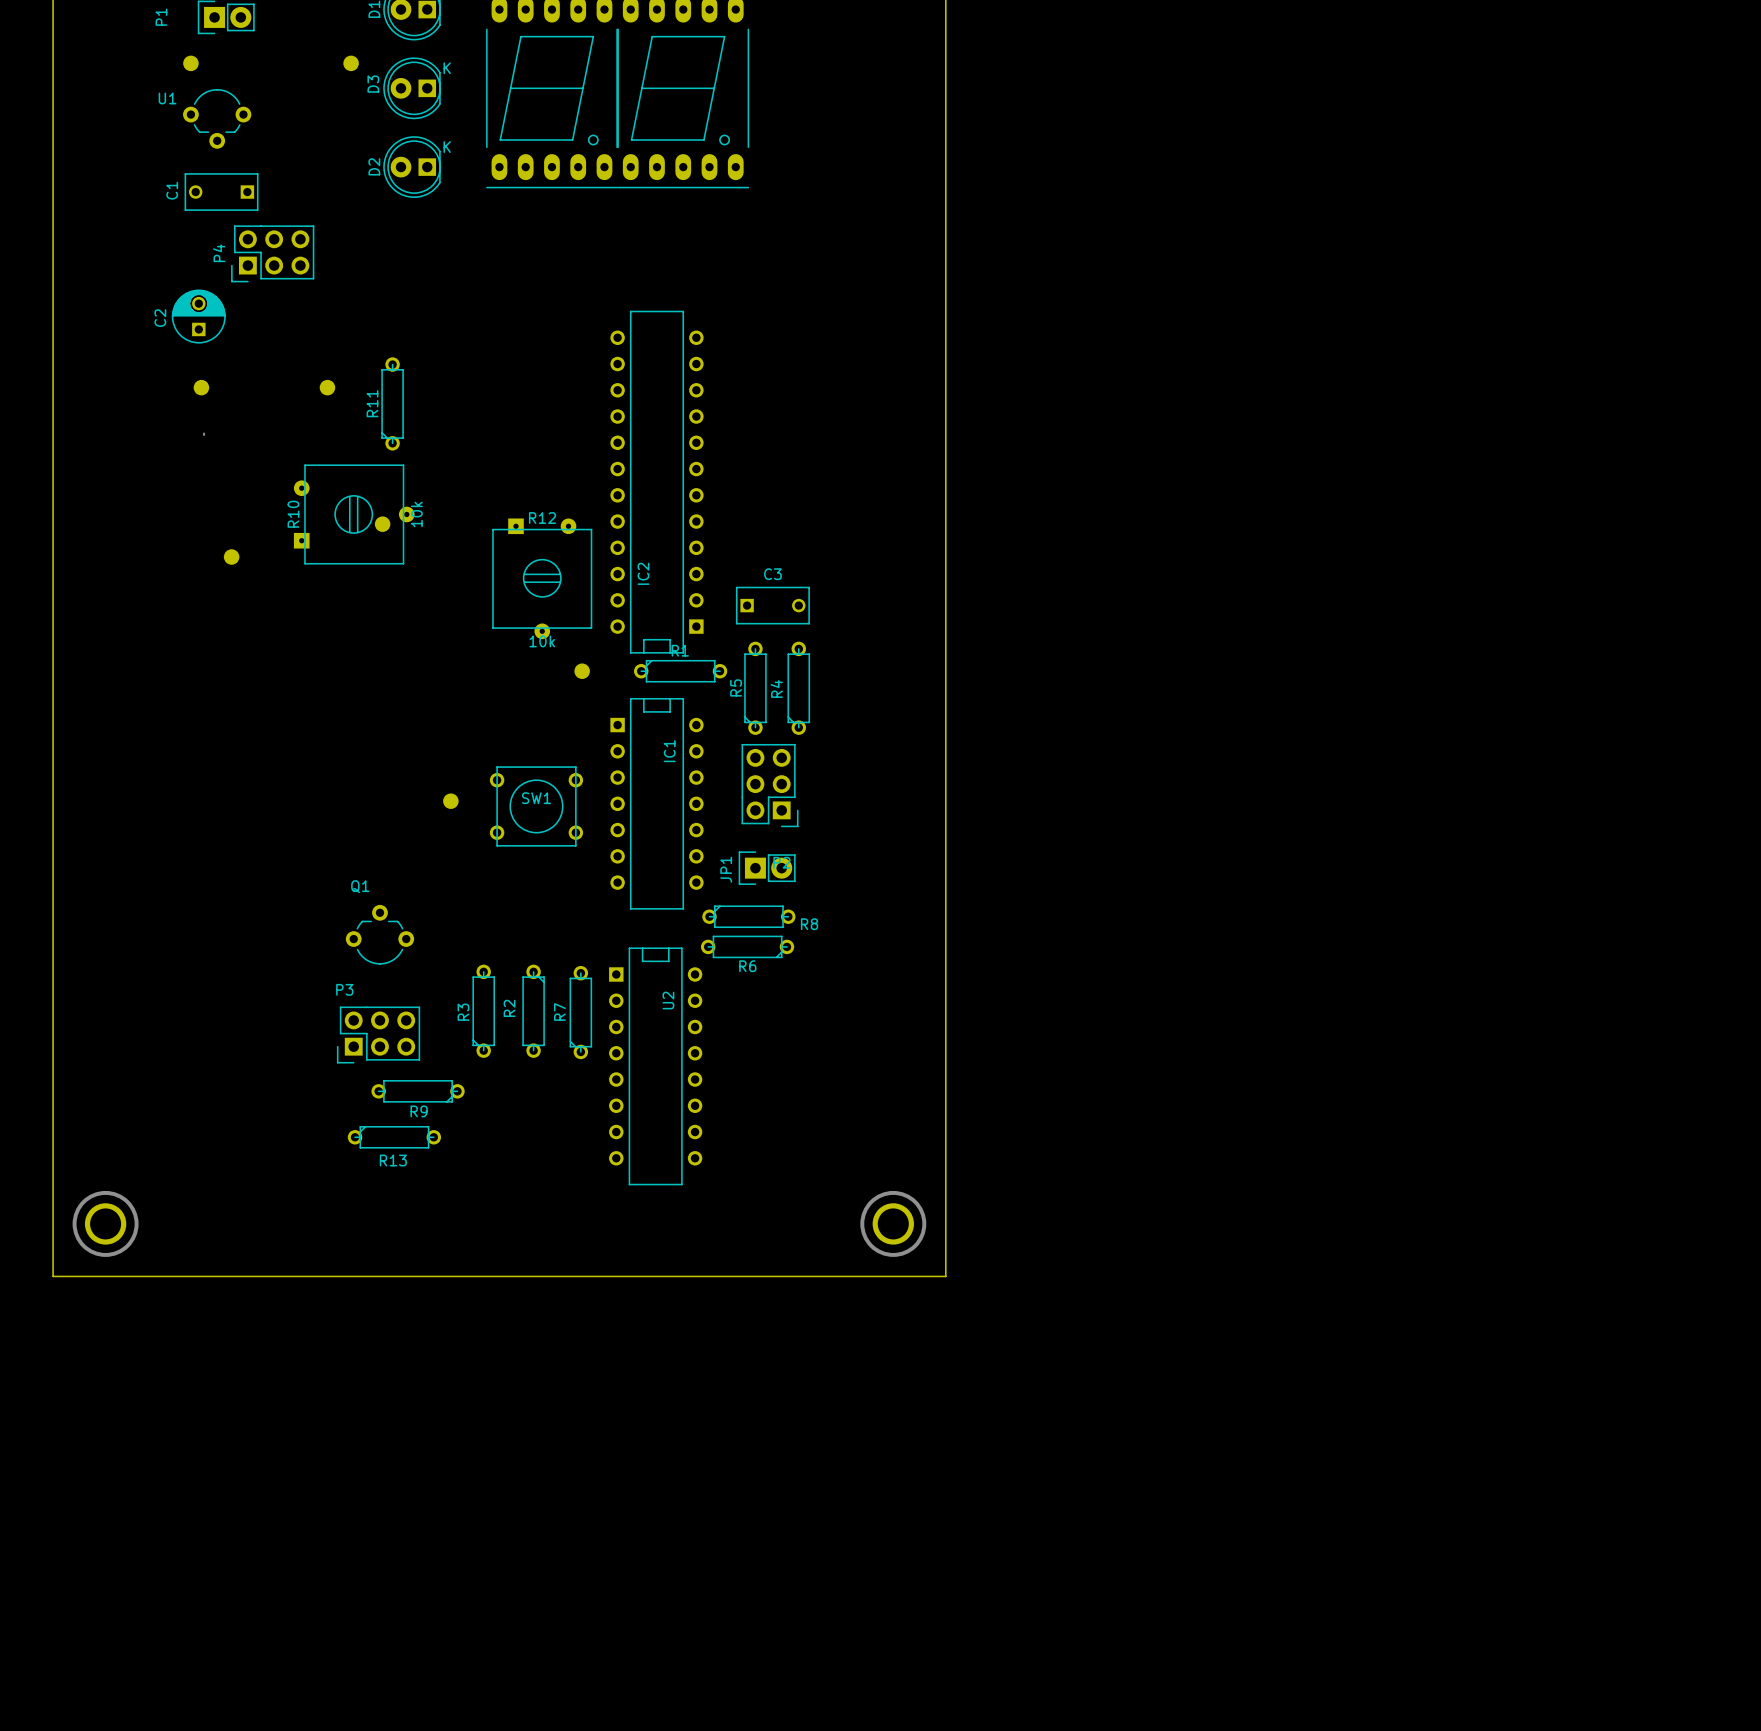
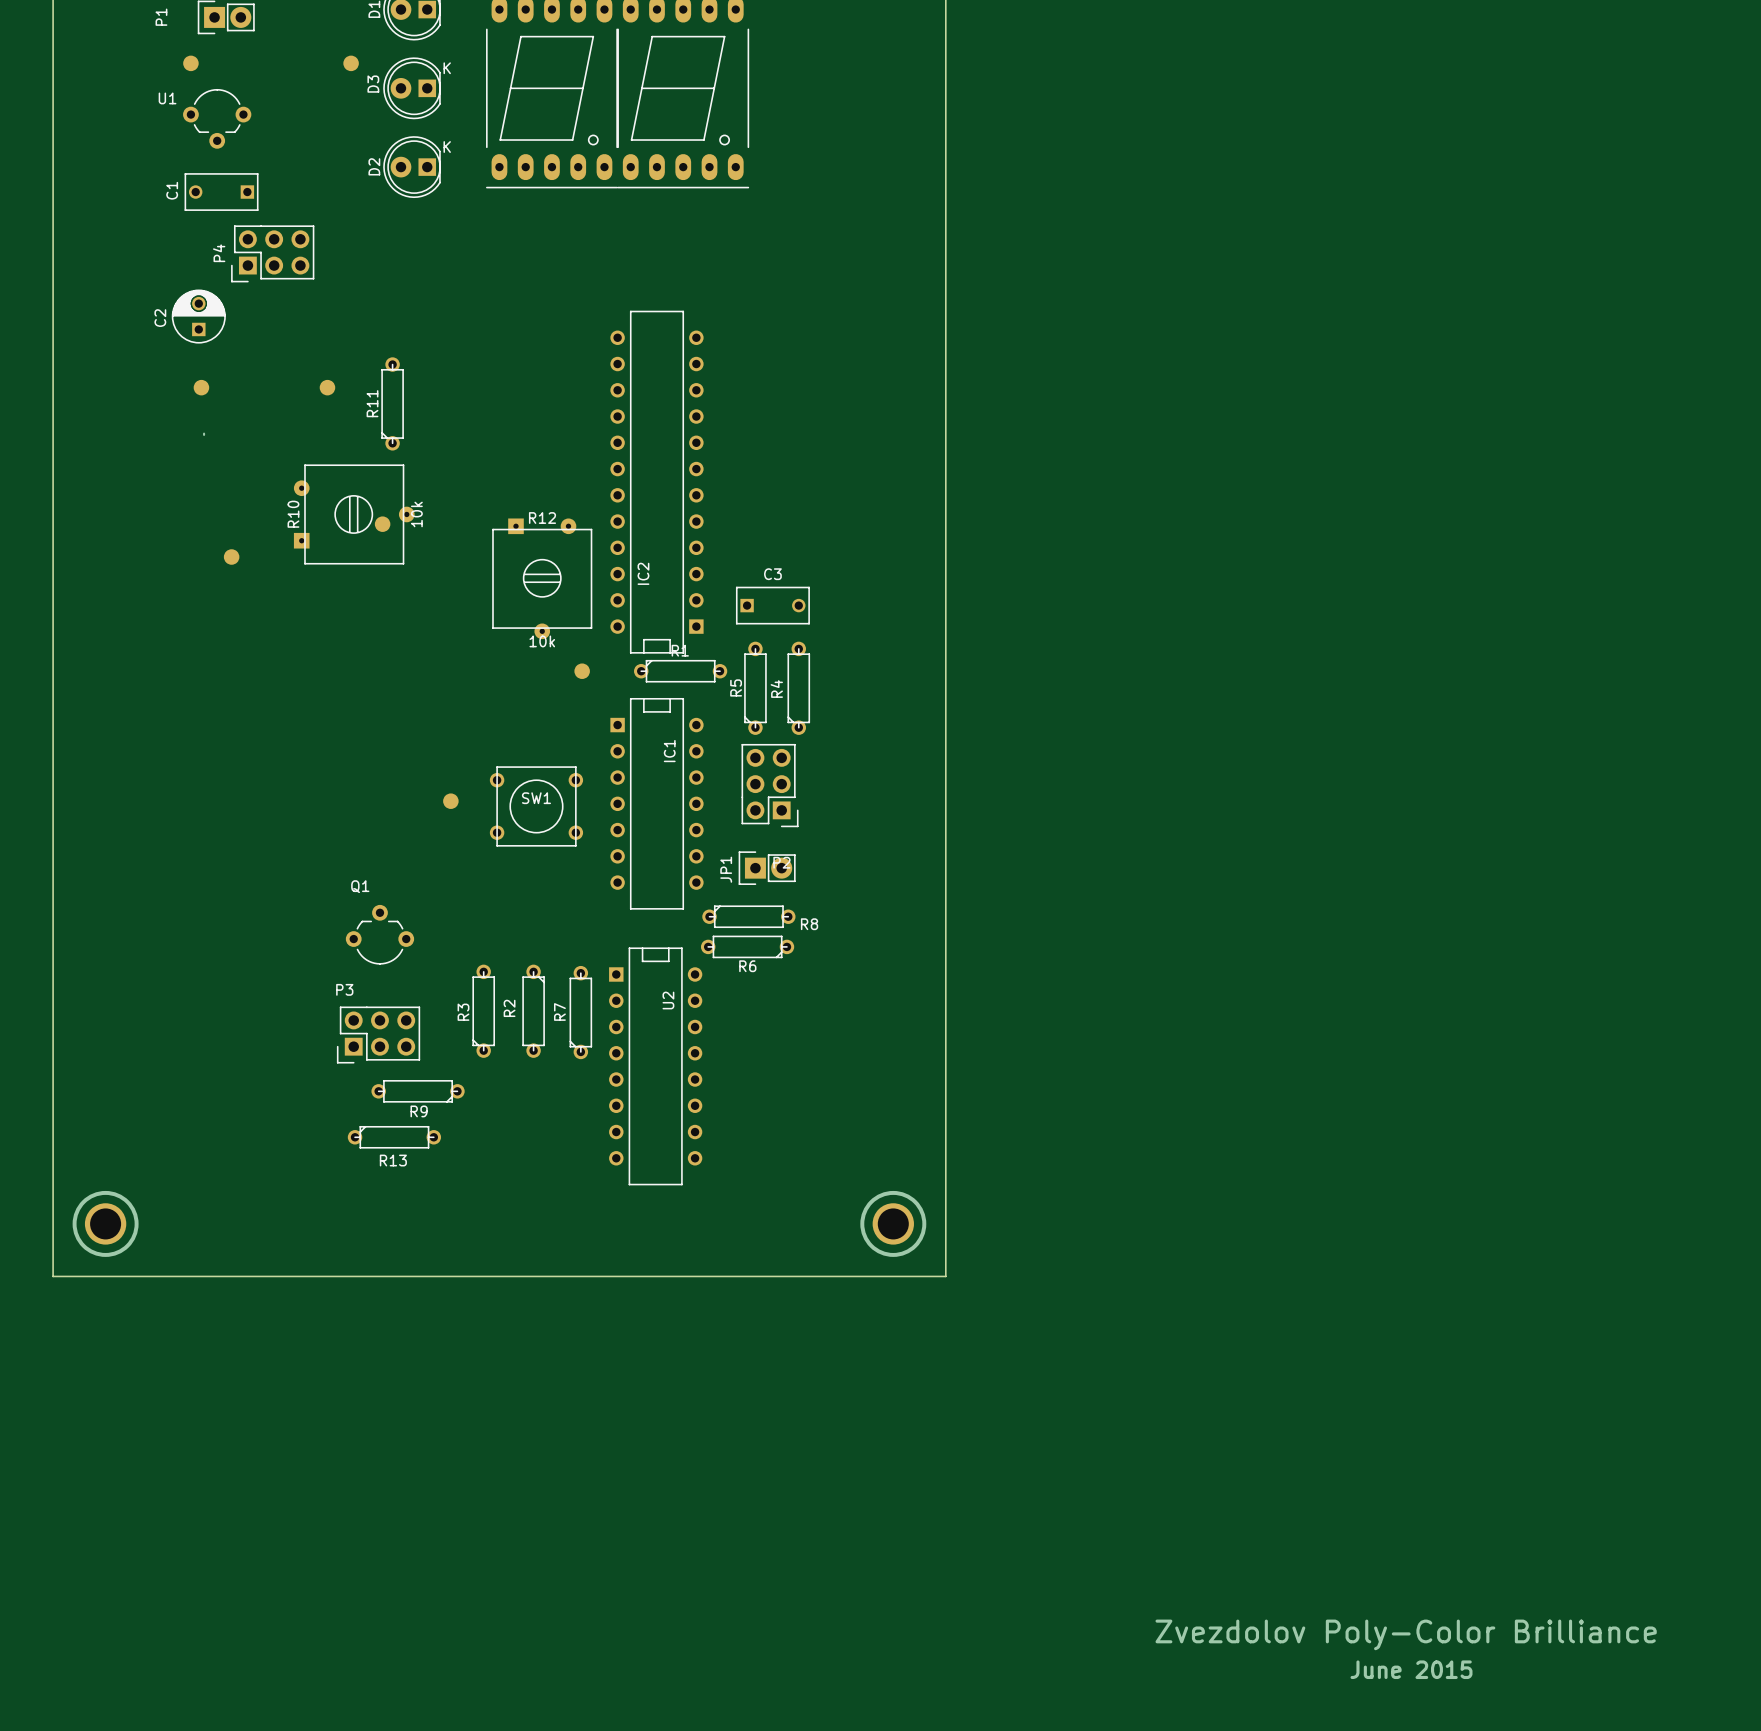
text: none -> Zvezdolov Poly-Color Brilliance (1406, 1634)
text: none -> June 2015 (1411, 1669)

